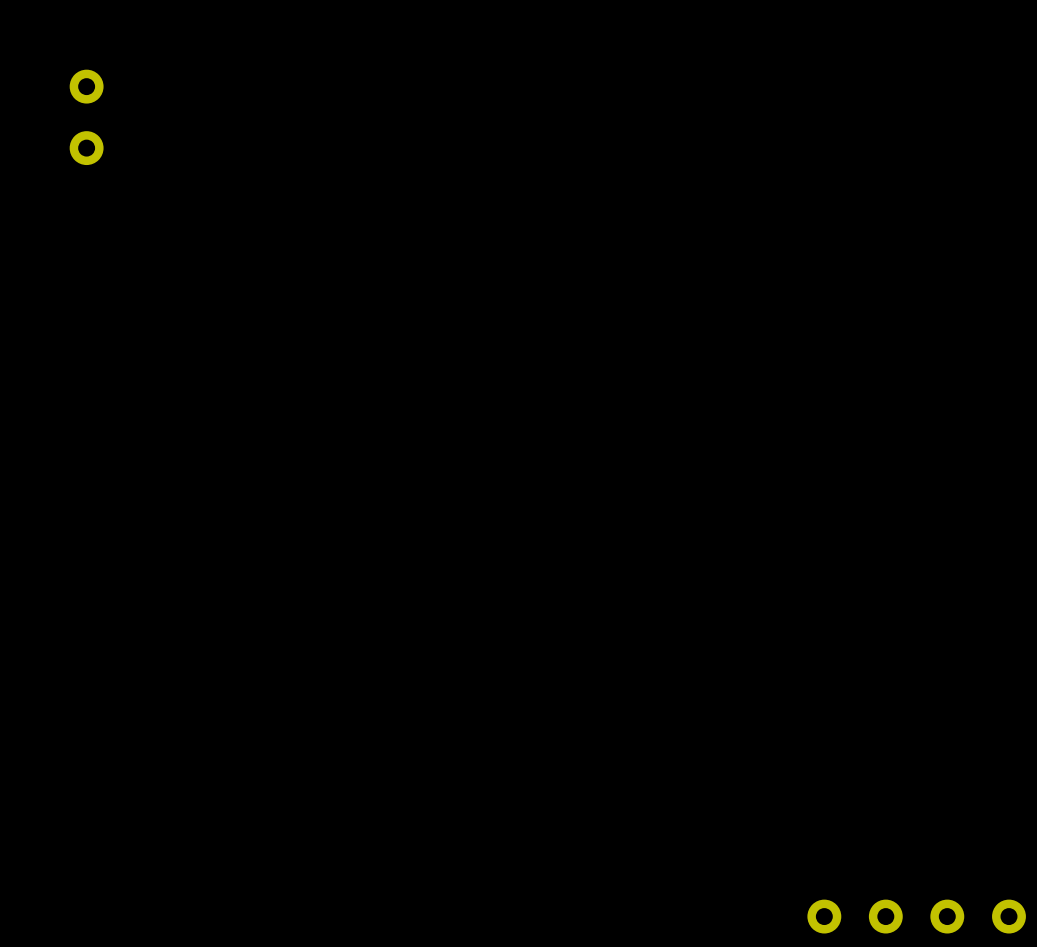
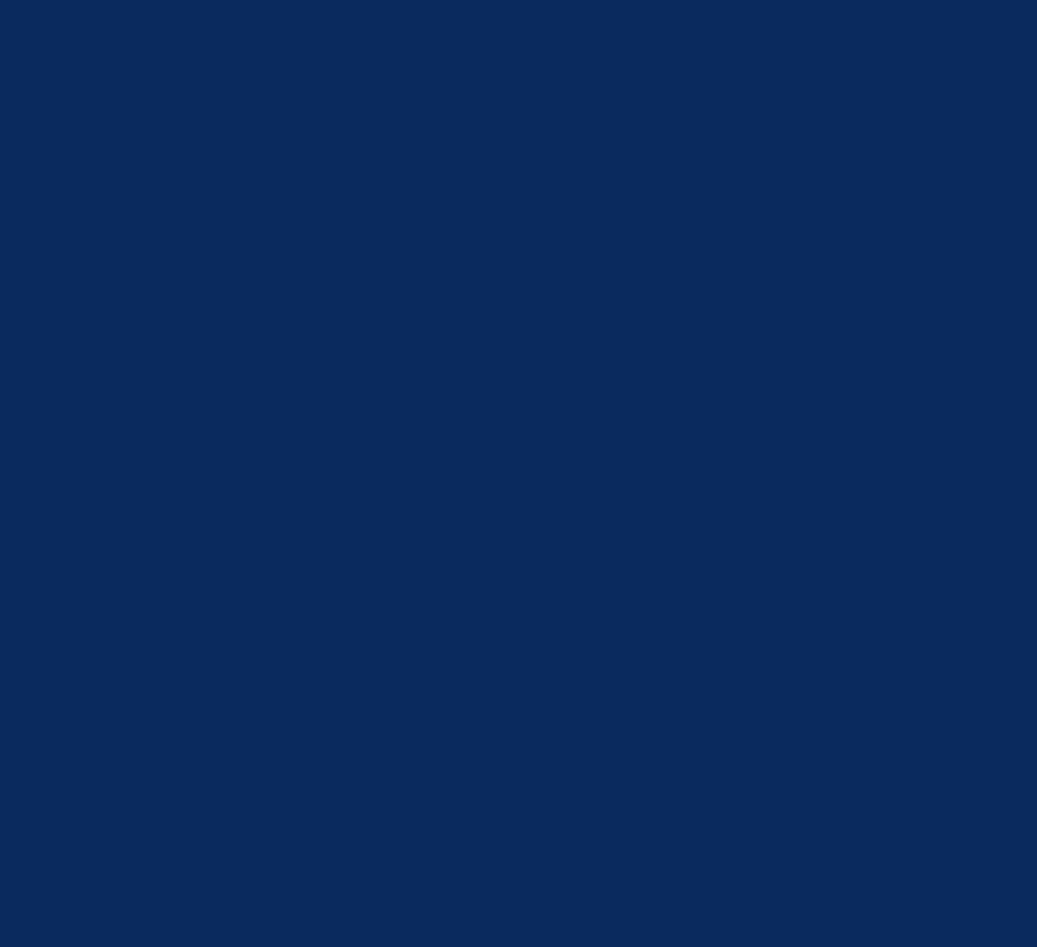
part: (86, 86) -> none
part: (86, 148) -> none
part: (824, 916) -> none
part: (885, 916) -> none
part: (947, 916) -> none
part: (1008, 916) -> none

